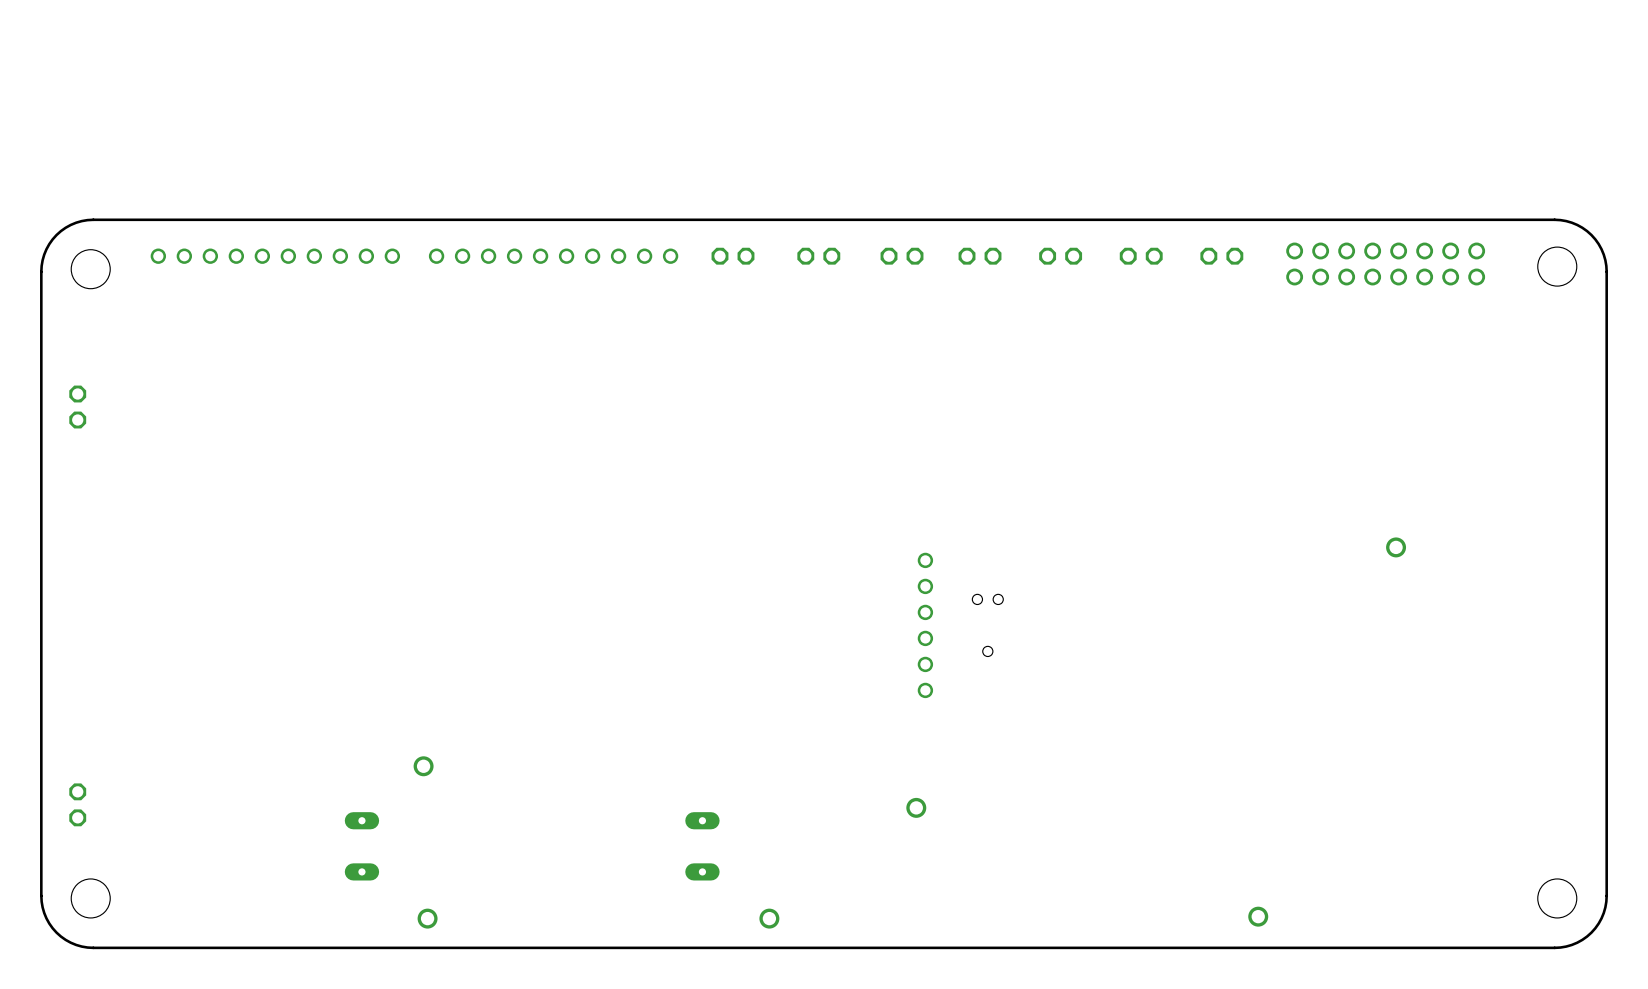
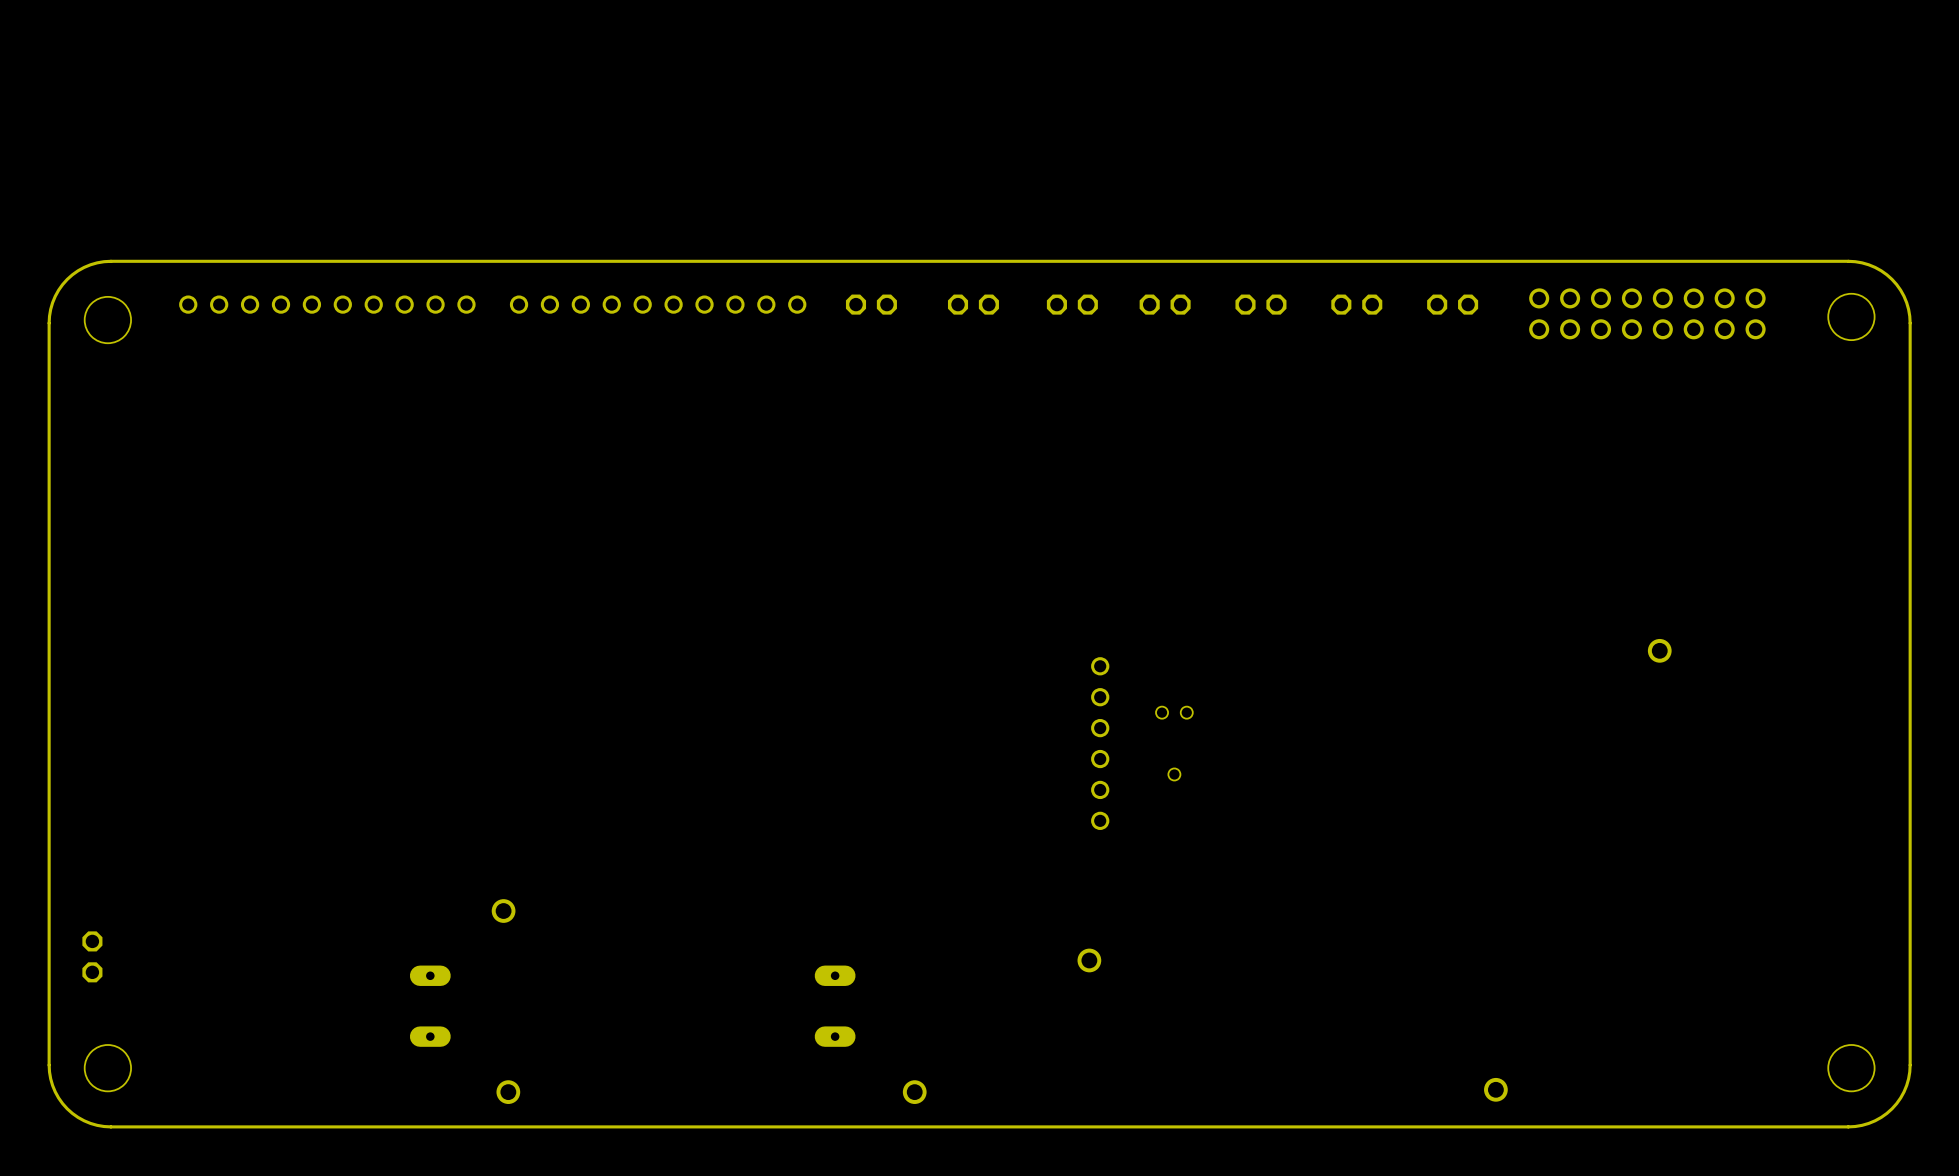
part: (77, 407) -> none

